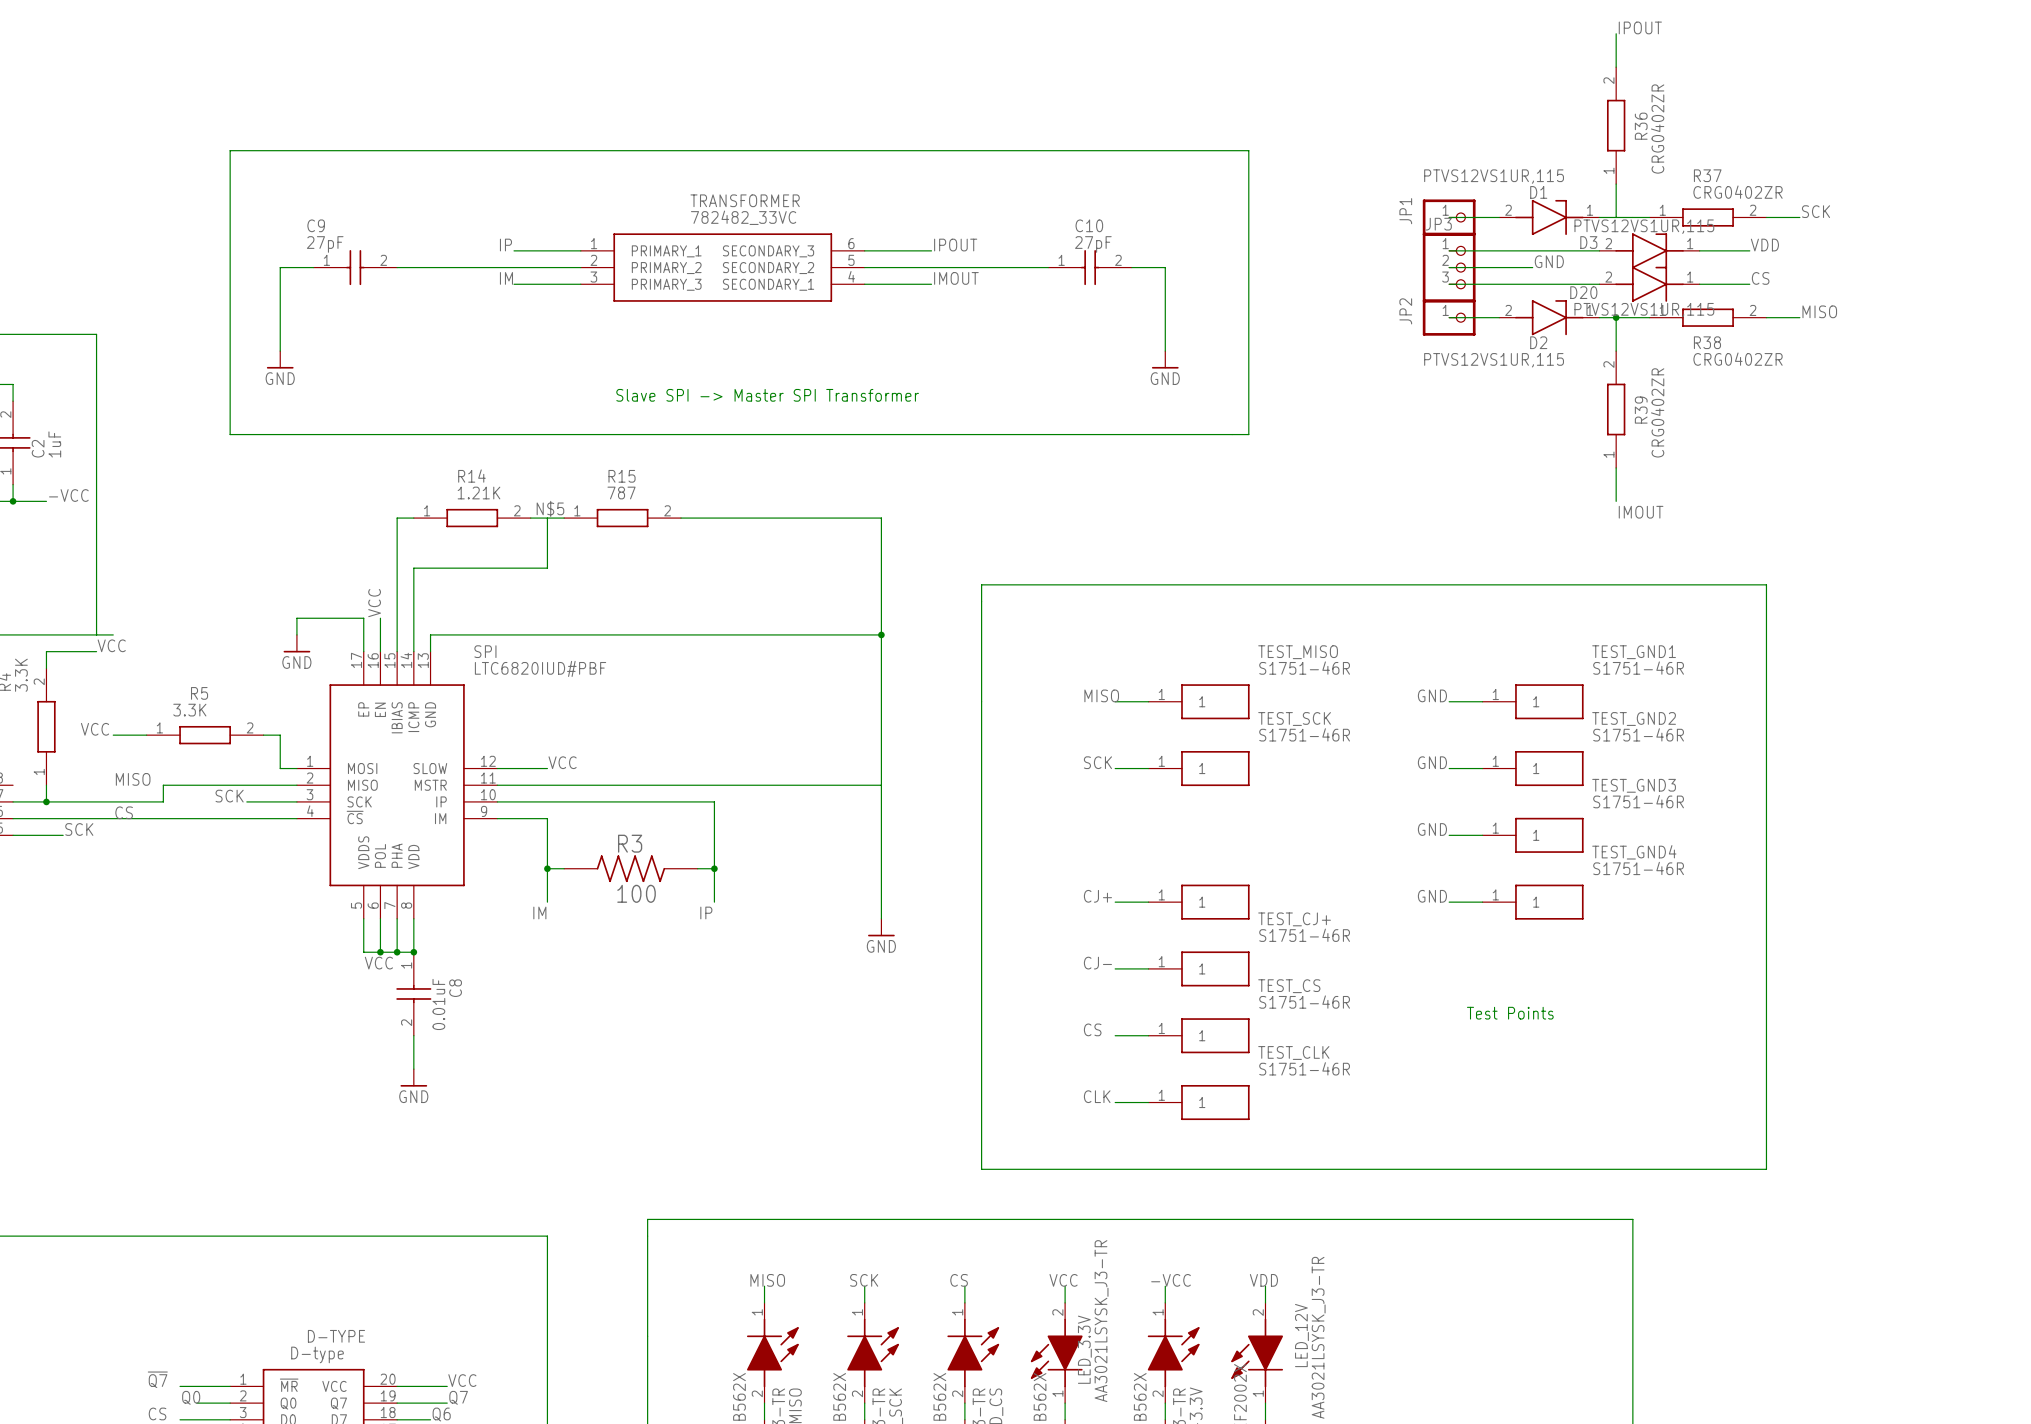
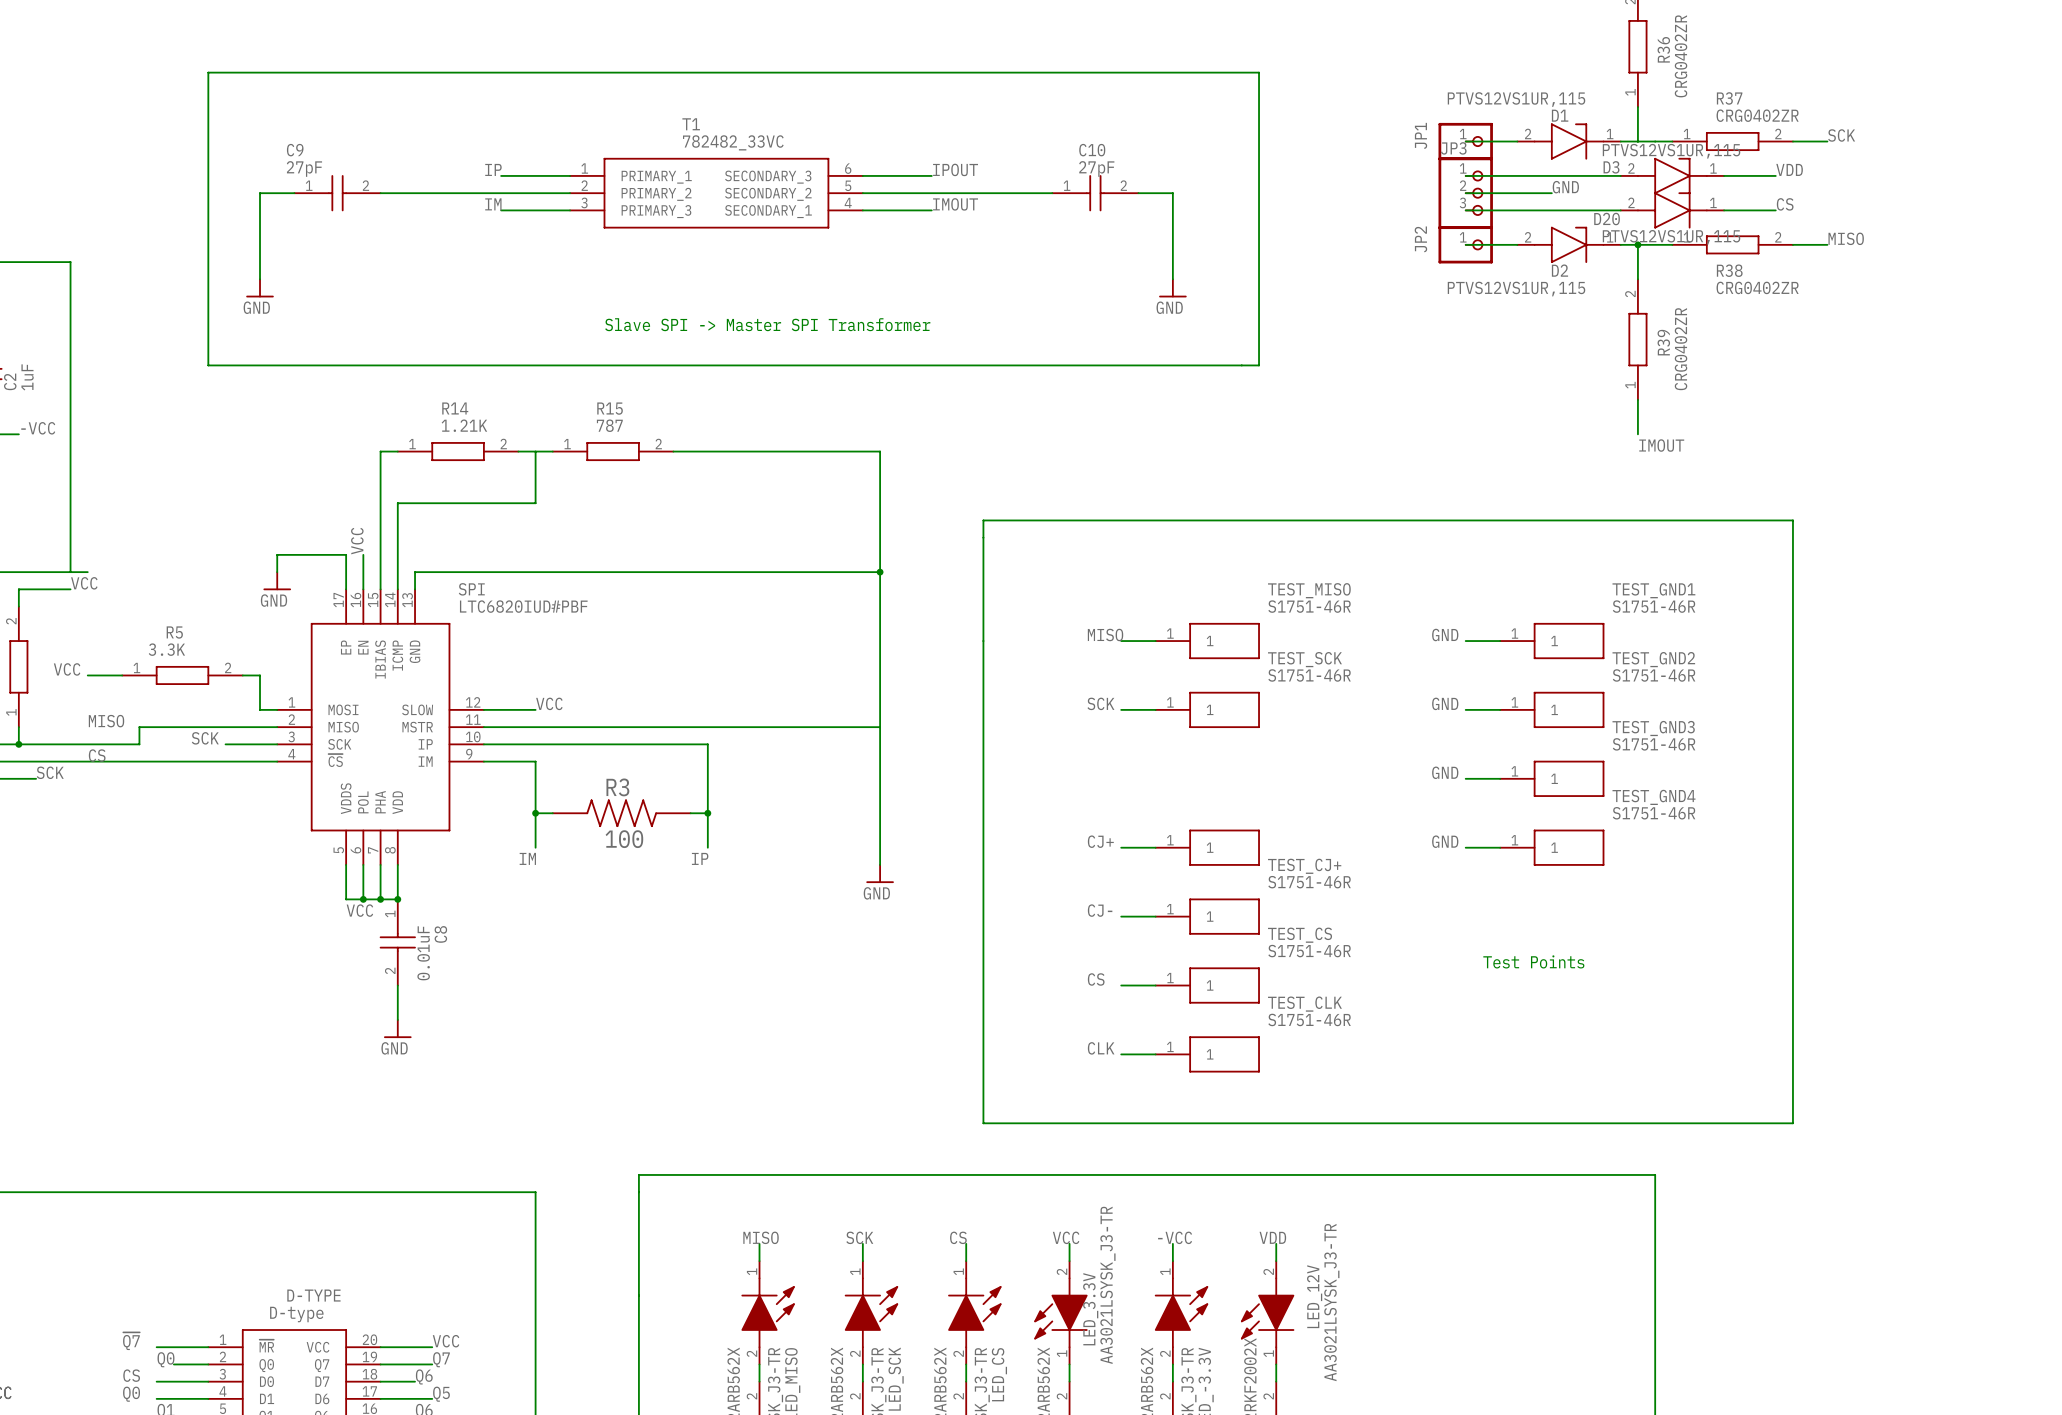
TRANSFORMER name: TRANSFORMER (745, 200) -> T1 (691, 124)
label: N$5 (550, 508) -> none

